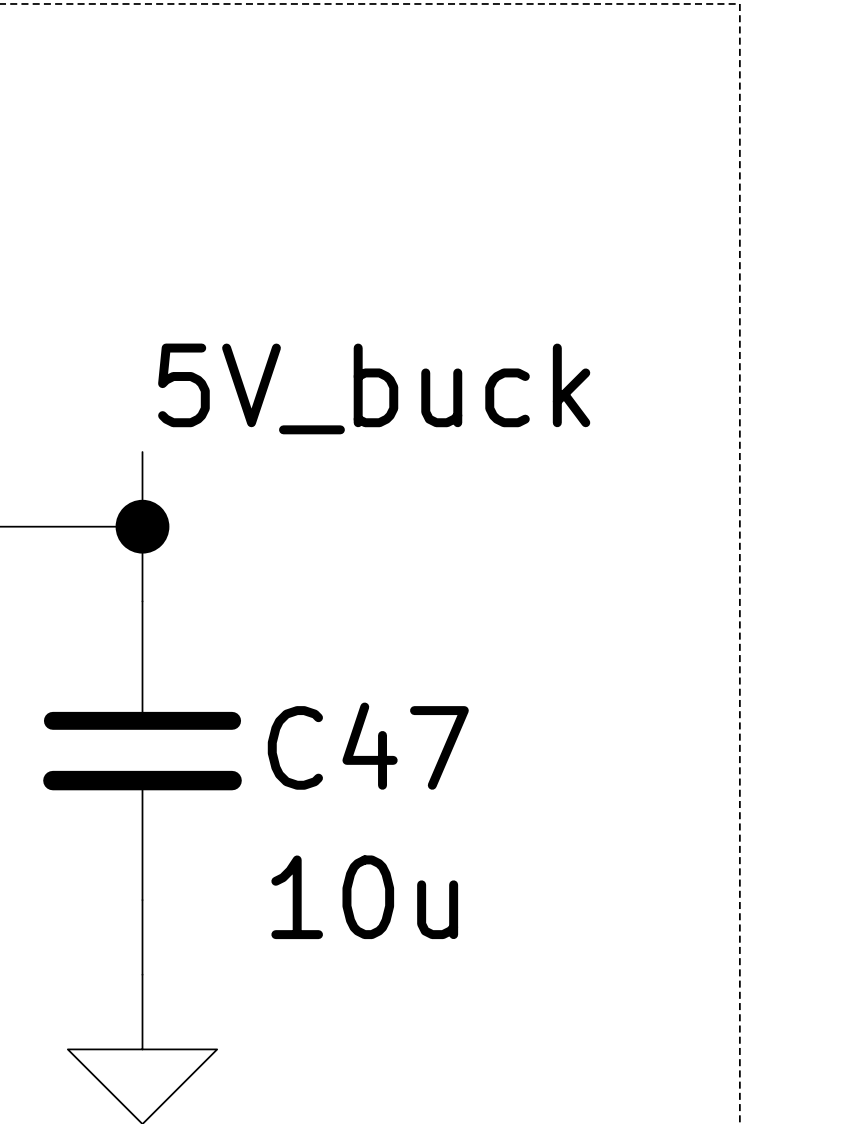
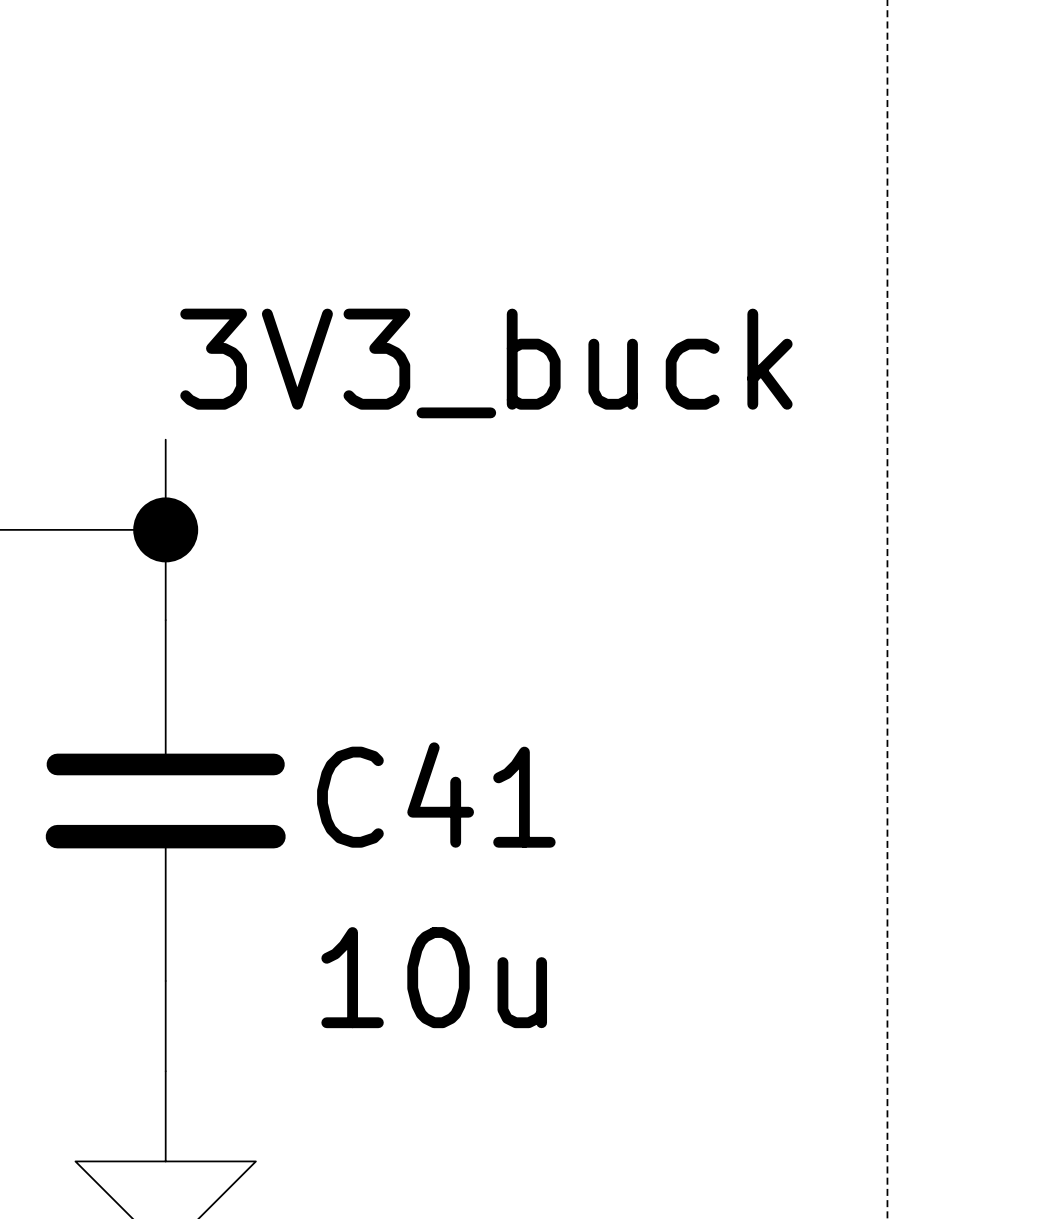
label: 5V_buck (374, 388) -> 3V3_buck (486, 363)
C47 name: C47 (368, 746) -> C41 (436, 795)

